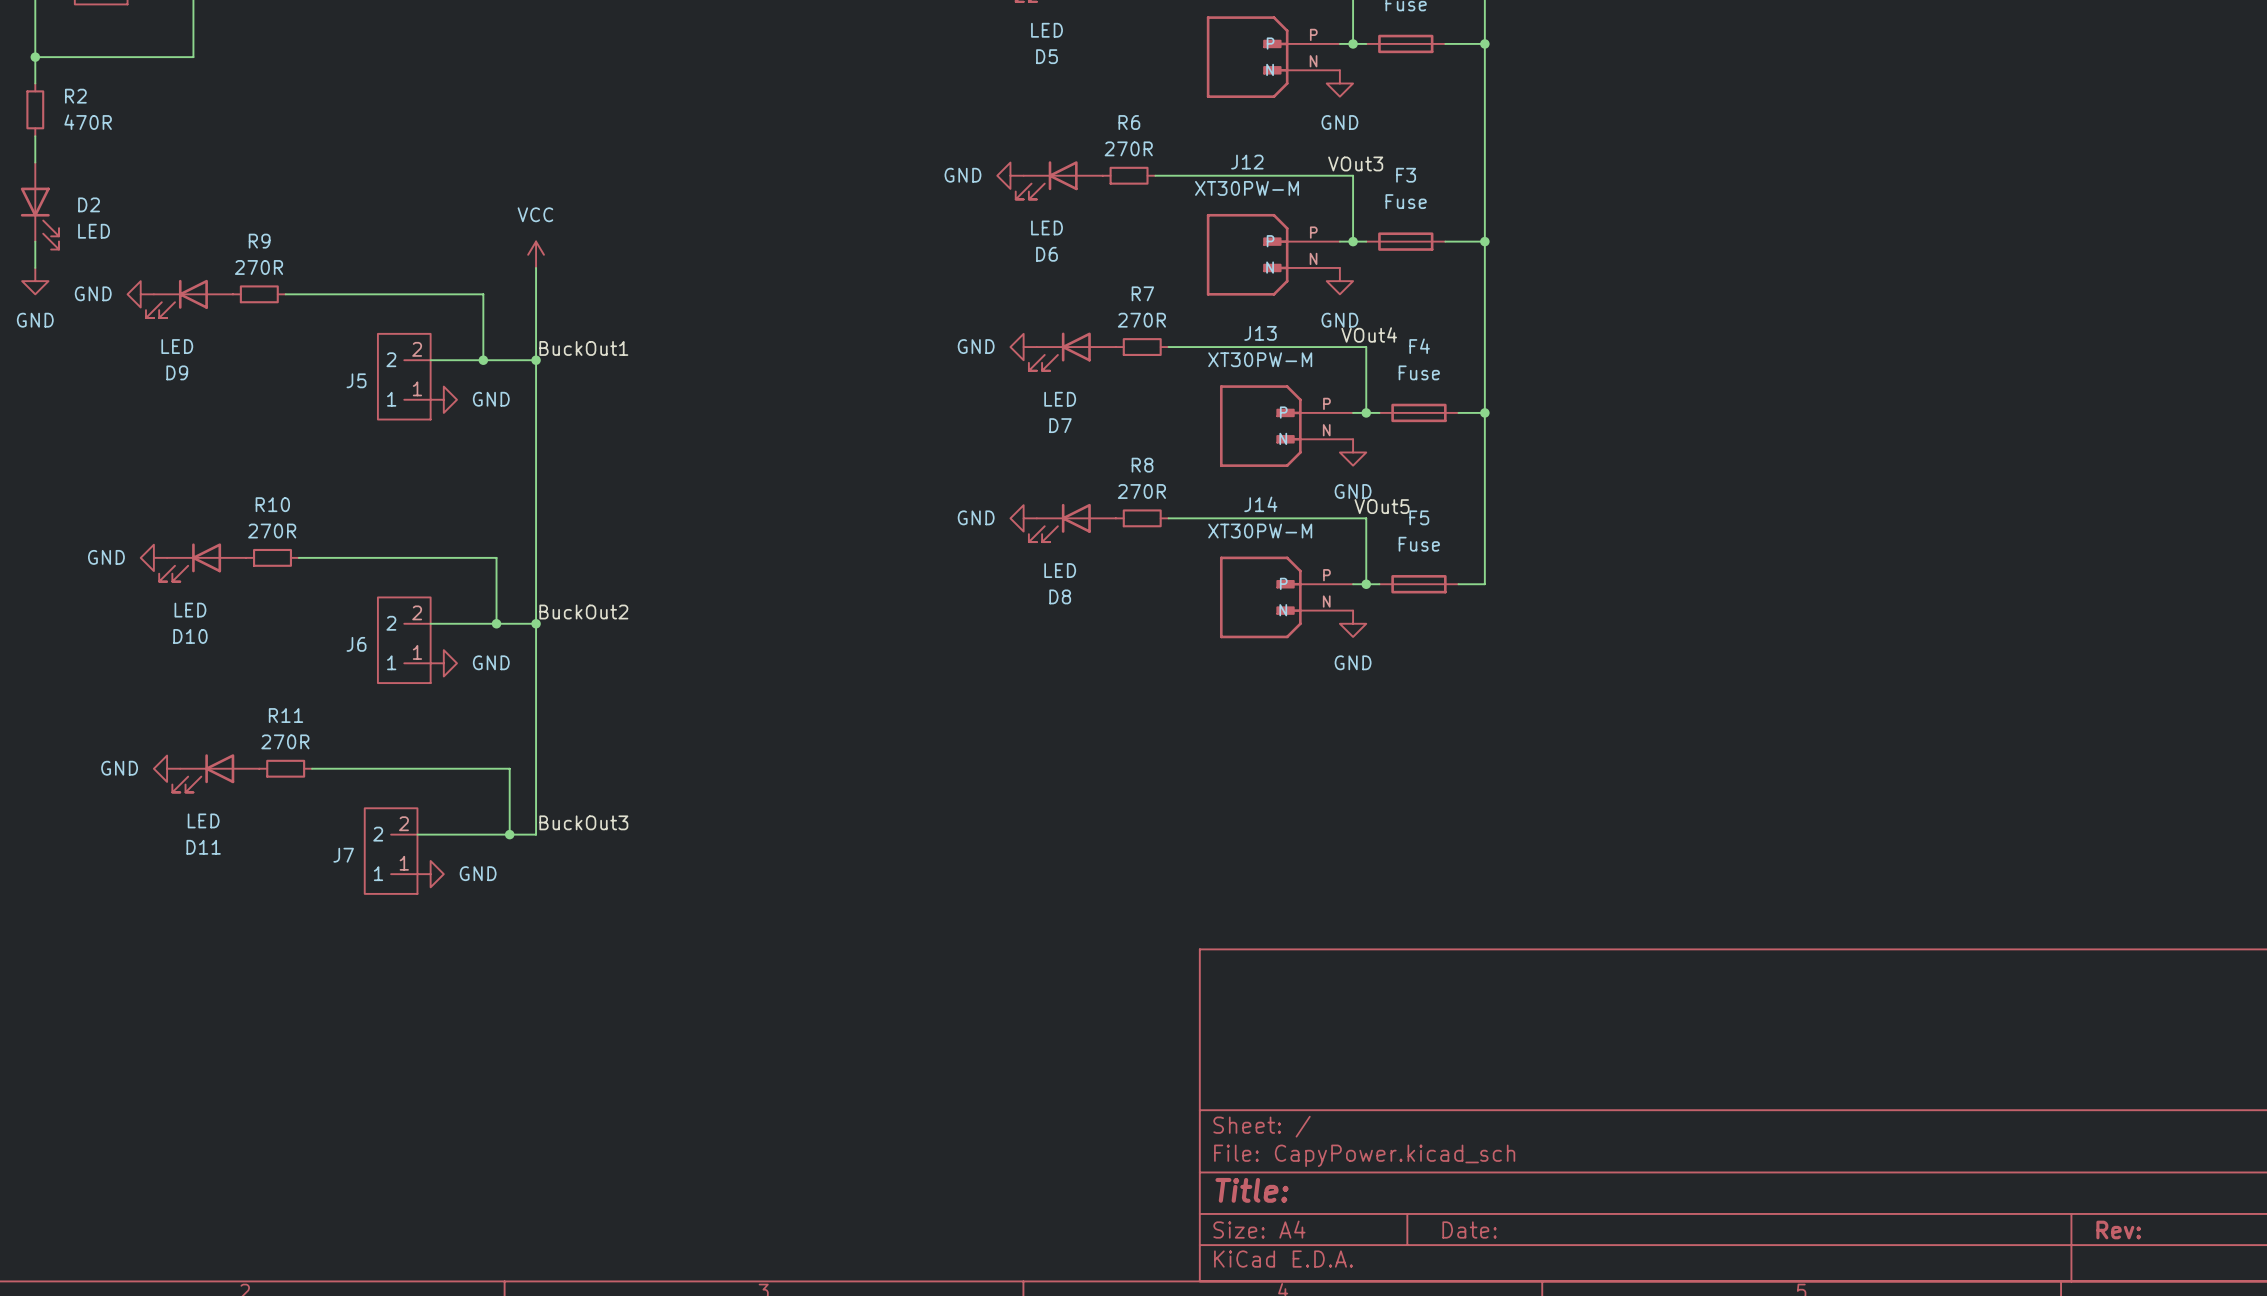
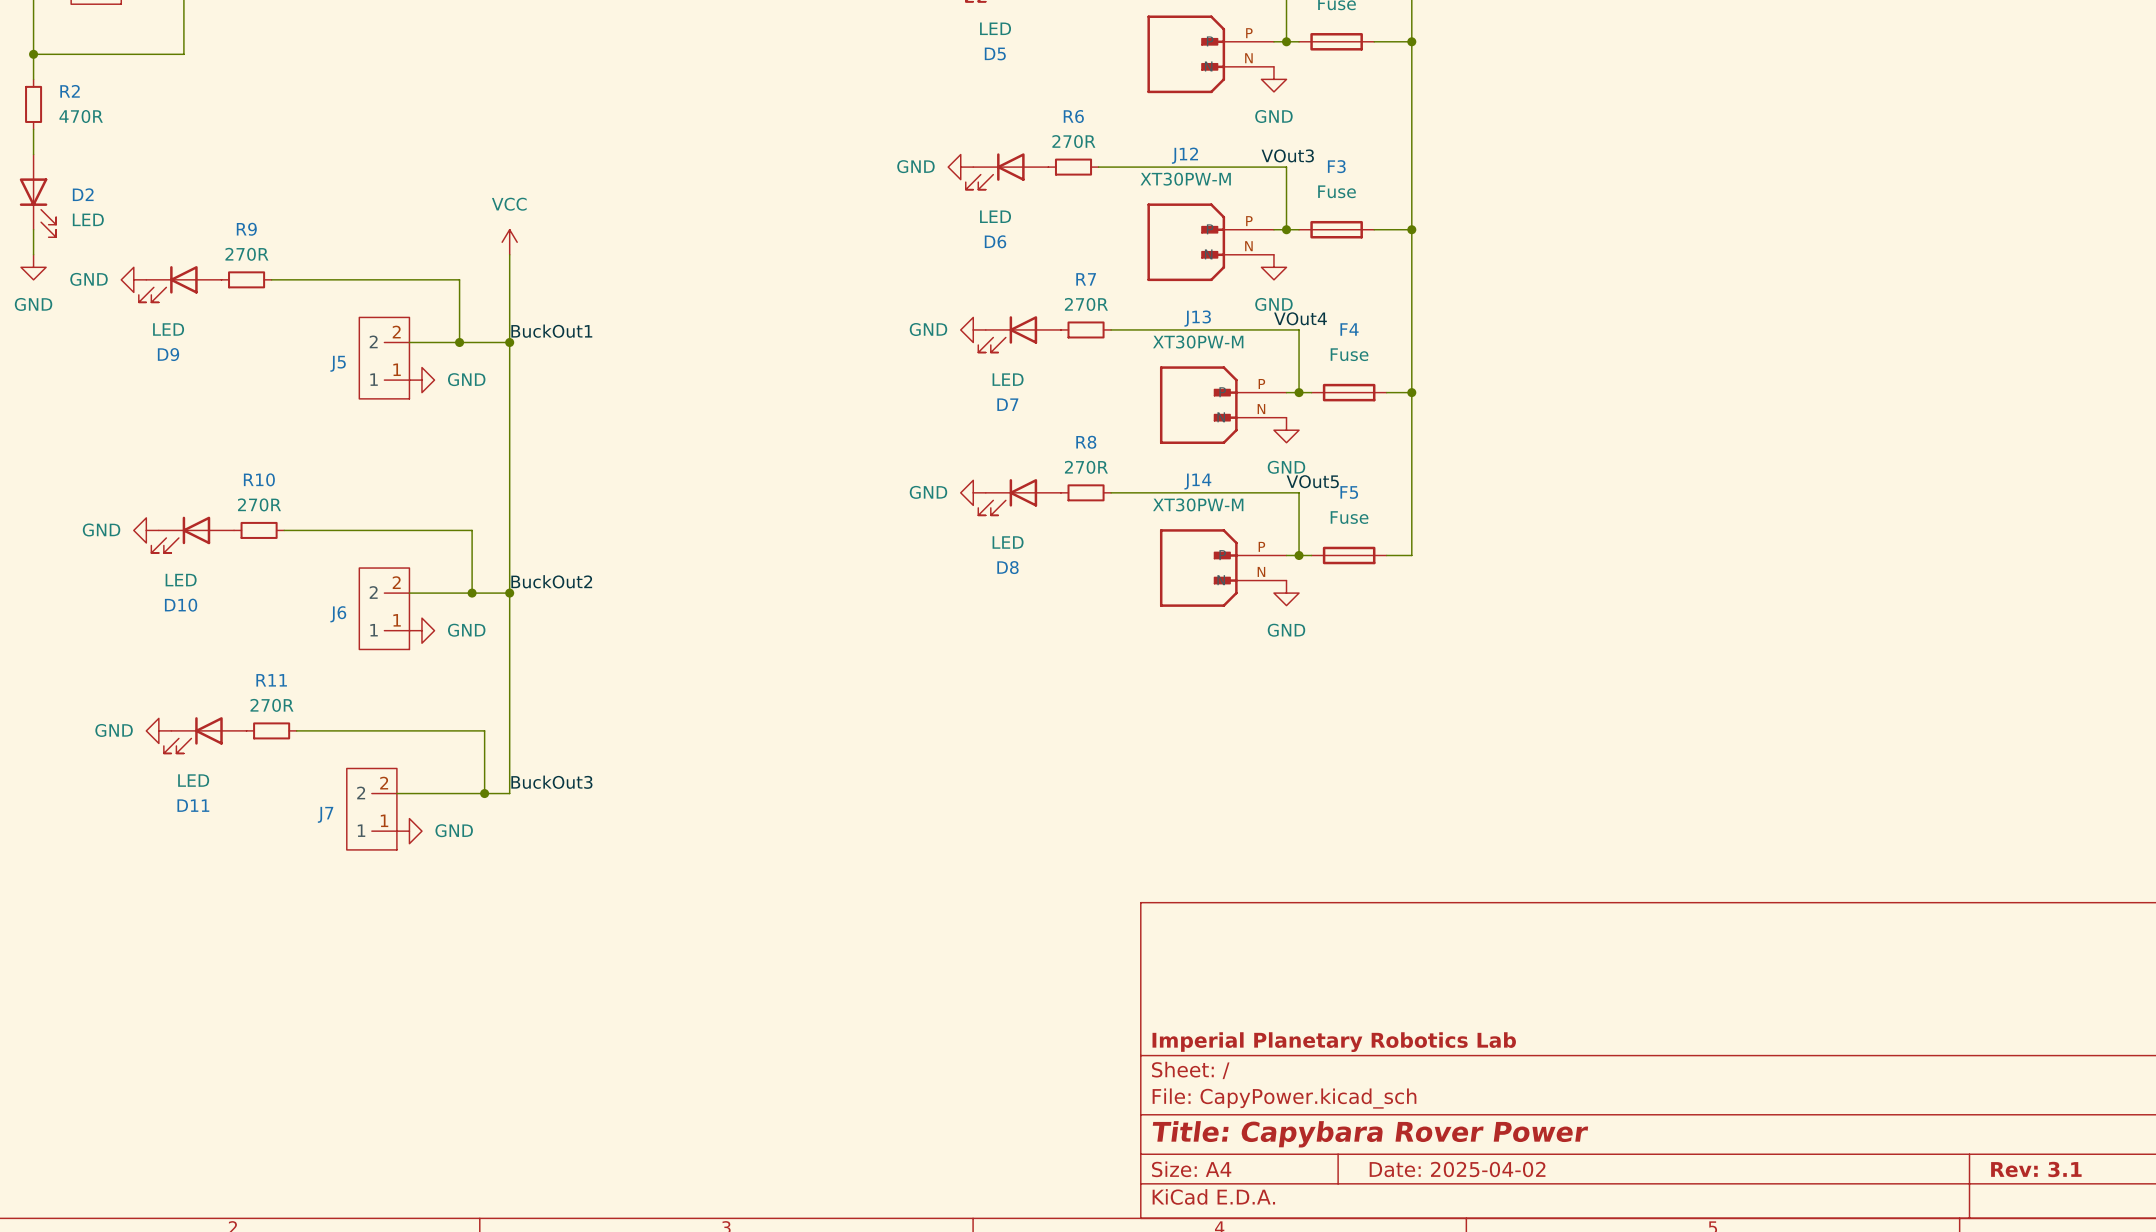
title block: none -> Imperial Planetary Robotics Lab (1334, 1042)
title block: Title: (1252, 1190) -> Title: Capybara Rover Power (1370, 1134)
title block: Date: (1469, 1229) -> Date: 2025-04-02 (1457, 1169)
title block: Rev: (2118, 1229) -> Rev: 3.1 (2036, 1169)

